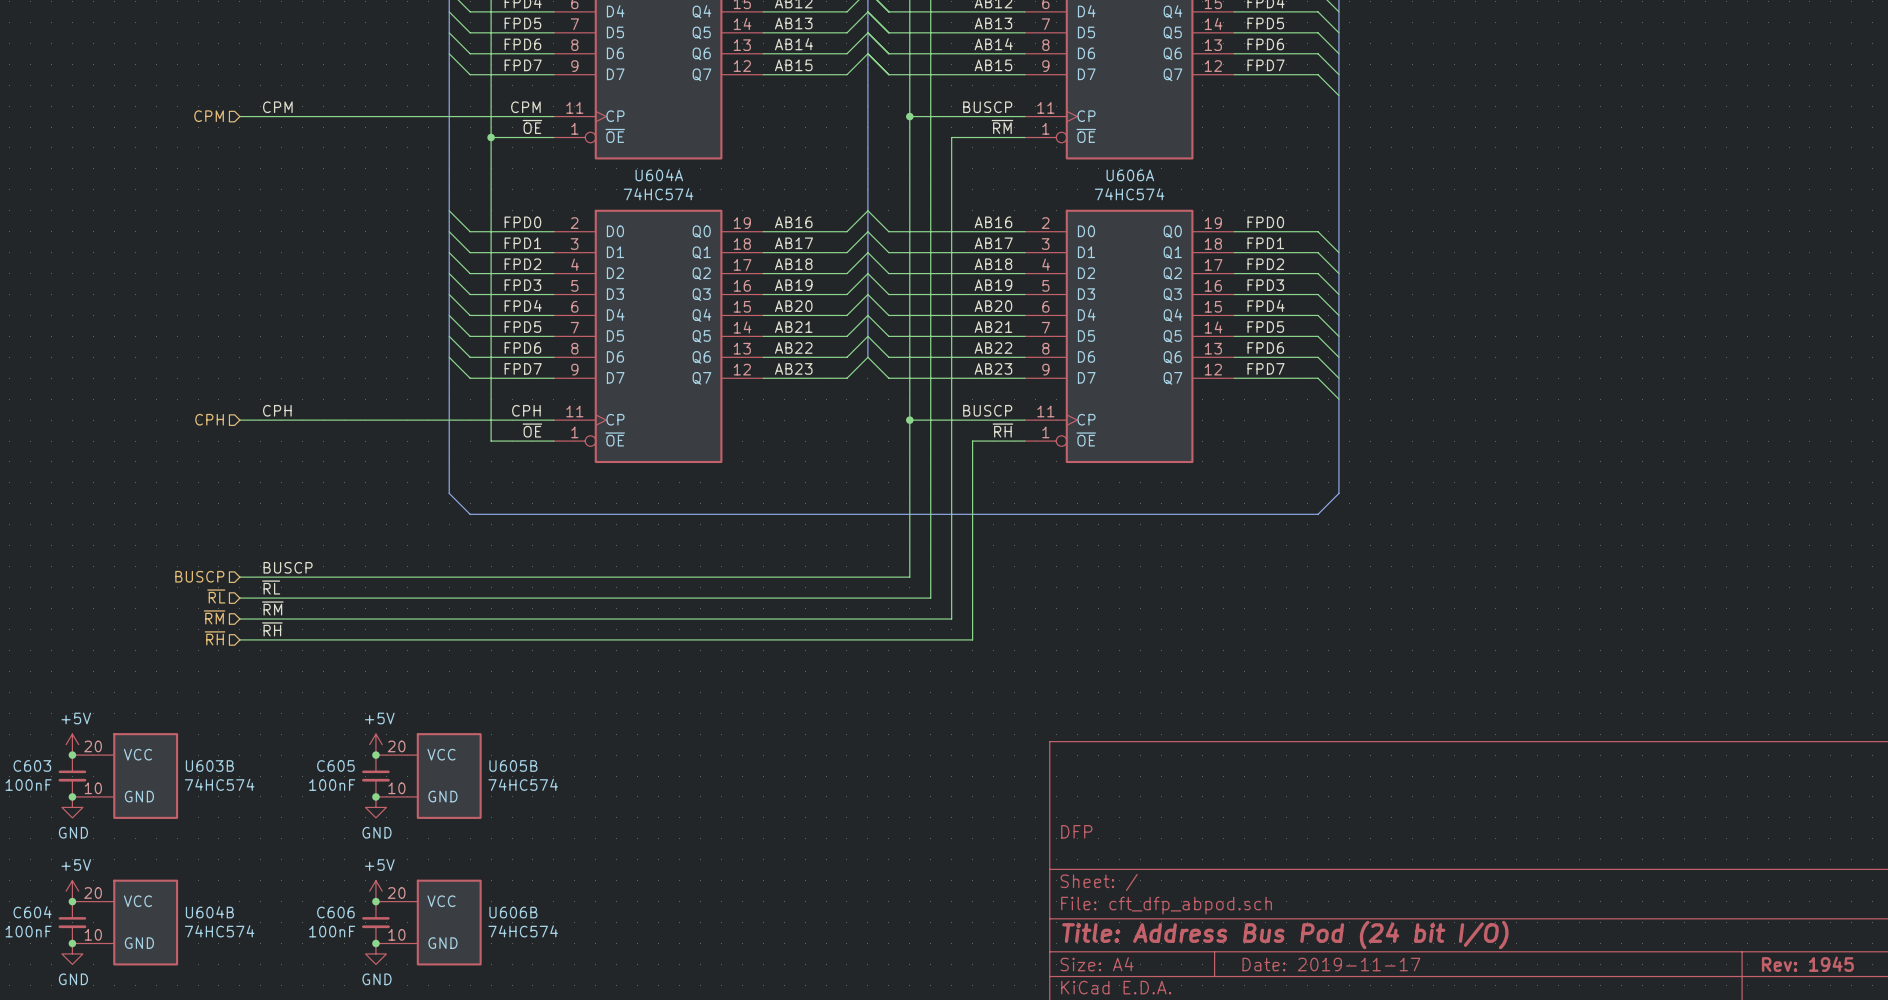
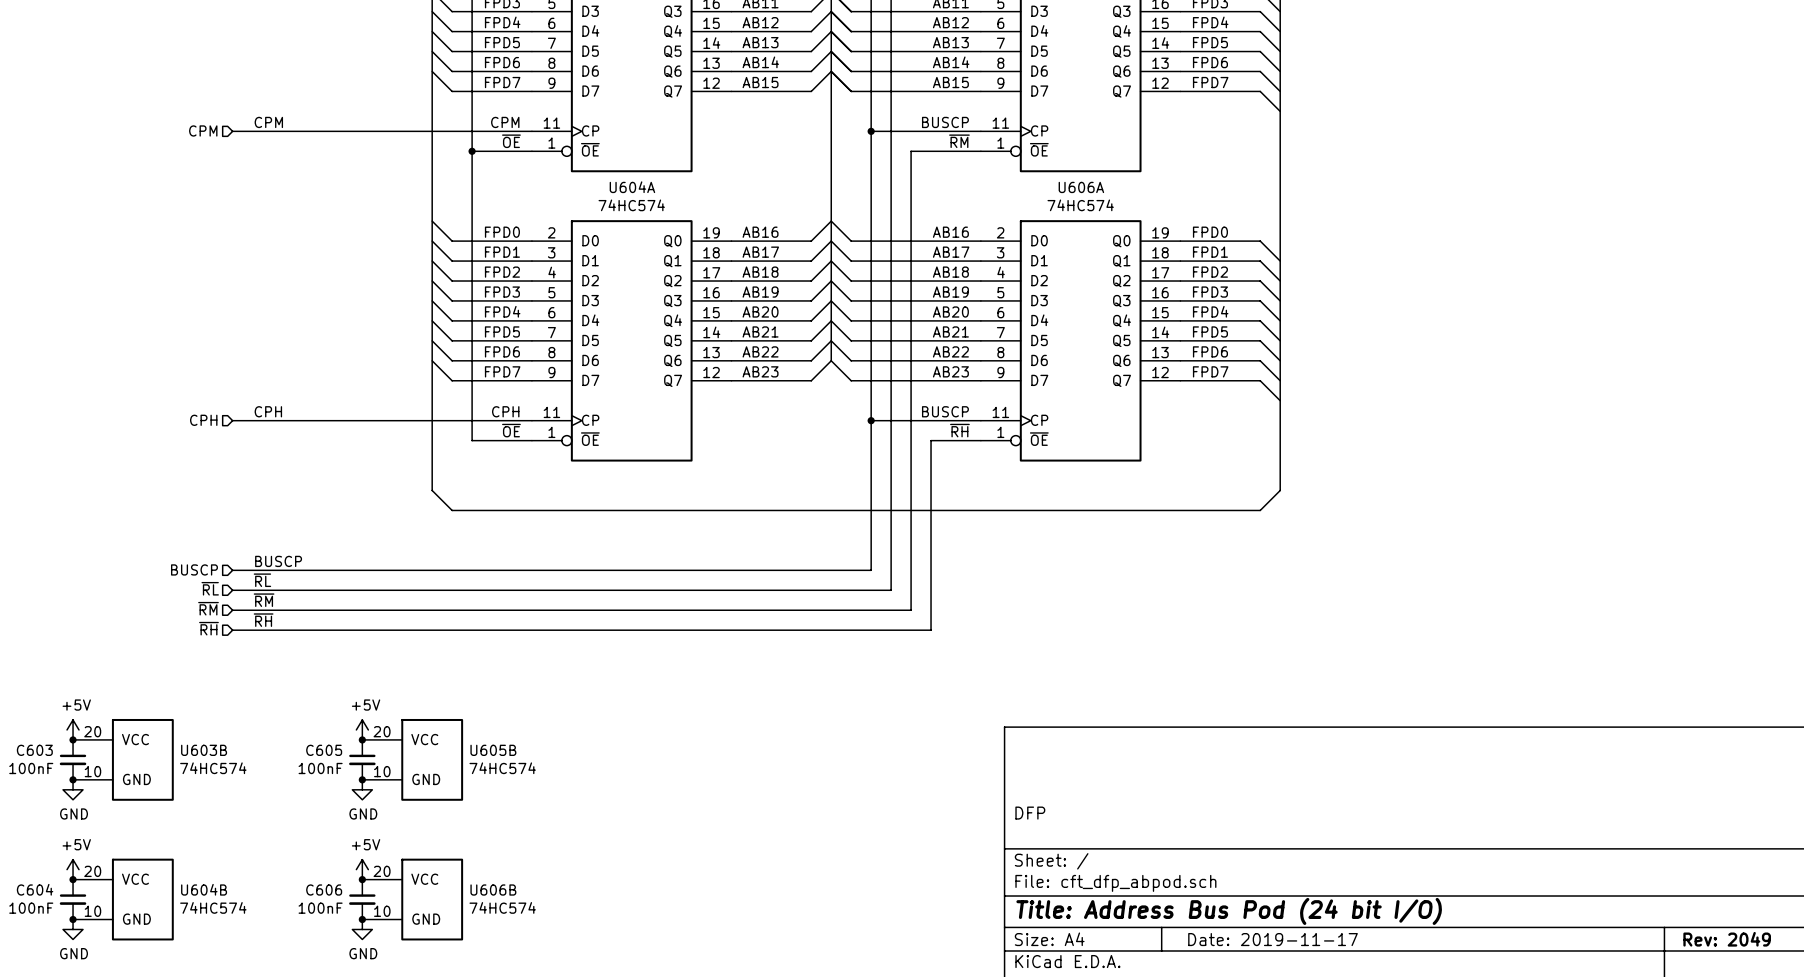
title block: Rev: 1945 (1807, 964) -> Rev: 2049 (1727, 939)

